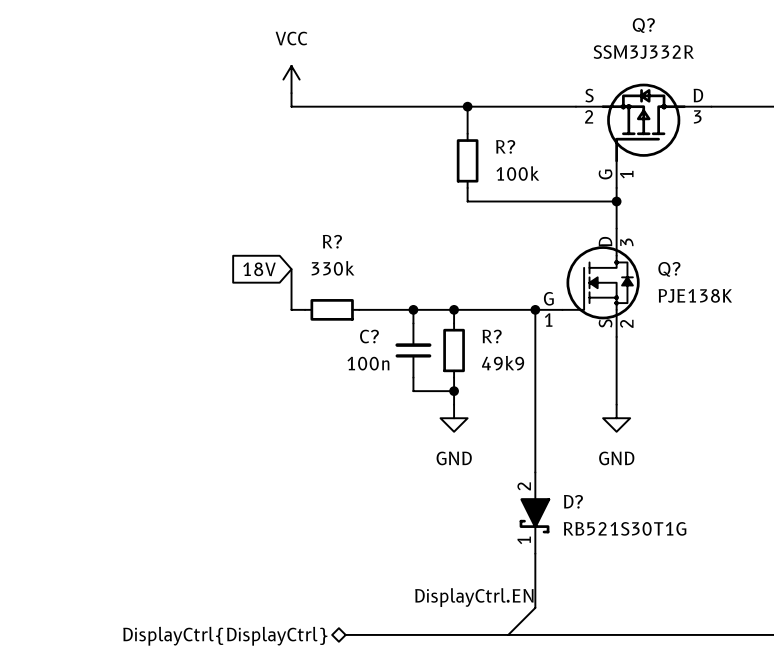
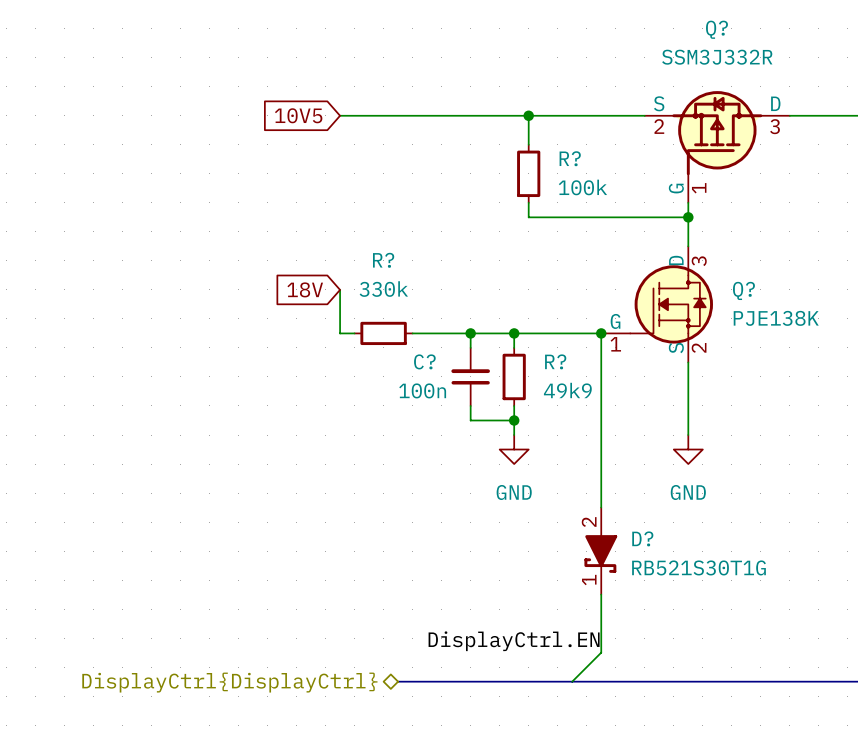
power symbol: VCC (291, 79) -> none
wire: (291, 93) (291, 106) -> none
global label: none -> 10V5 (298, 115)

